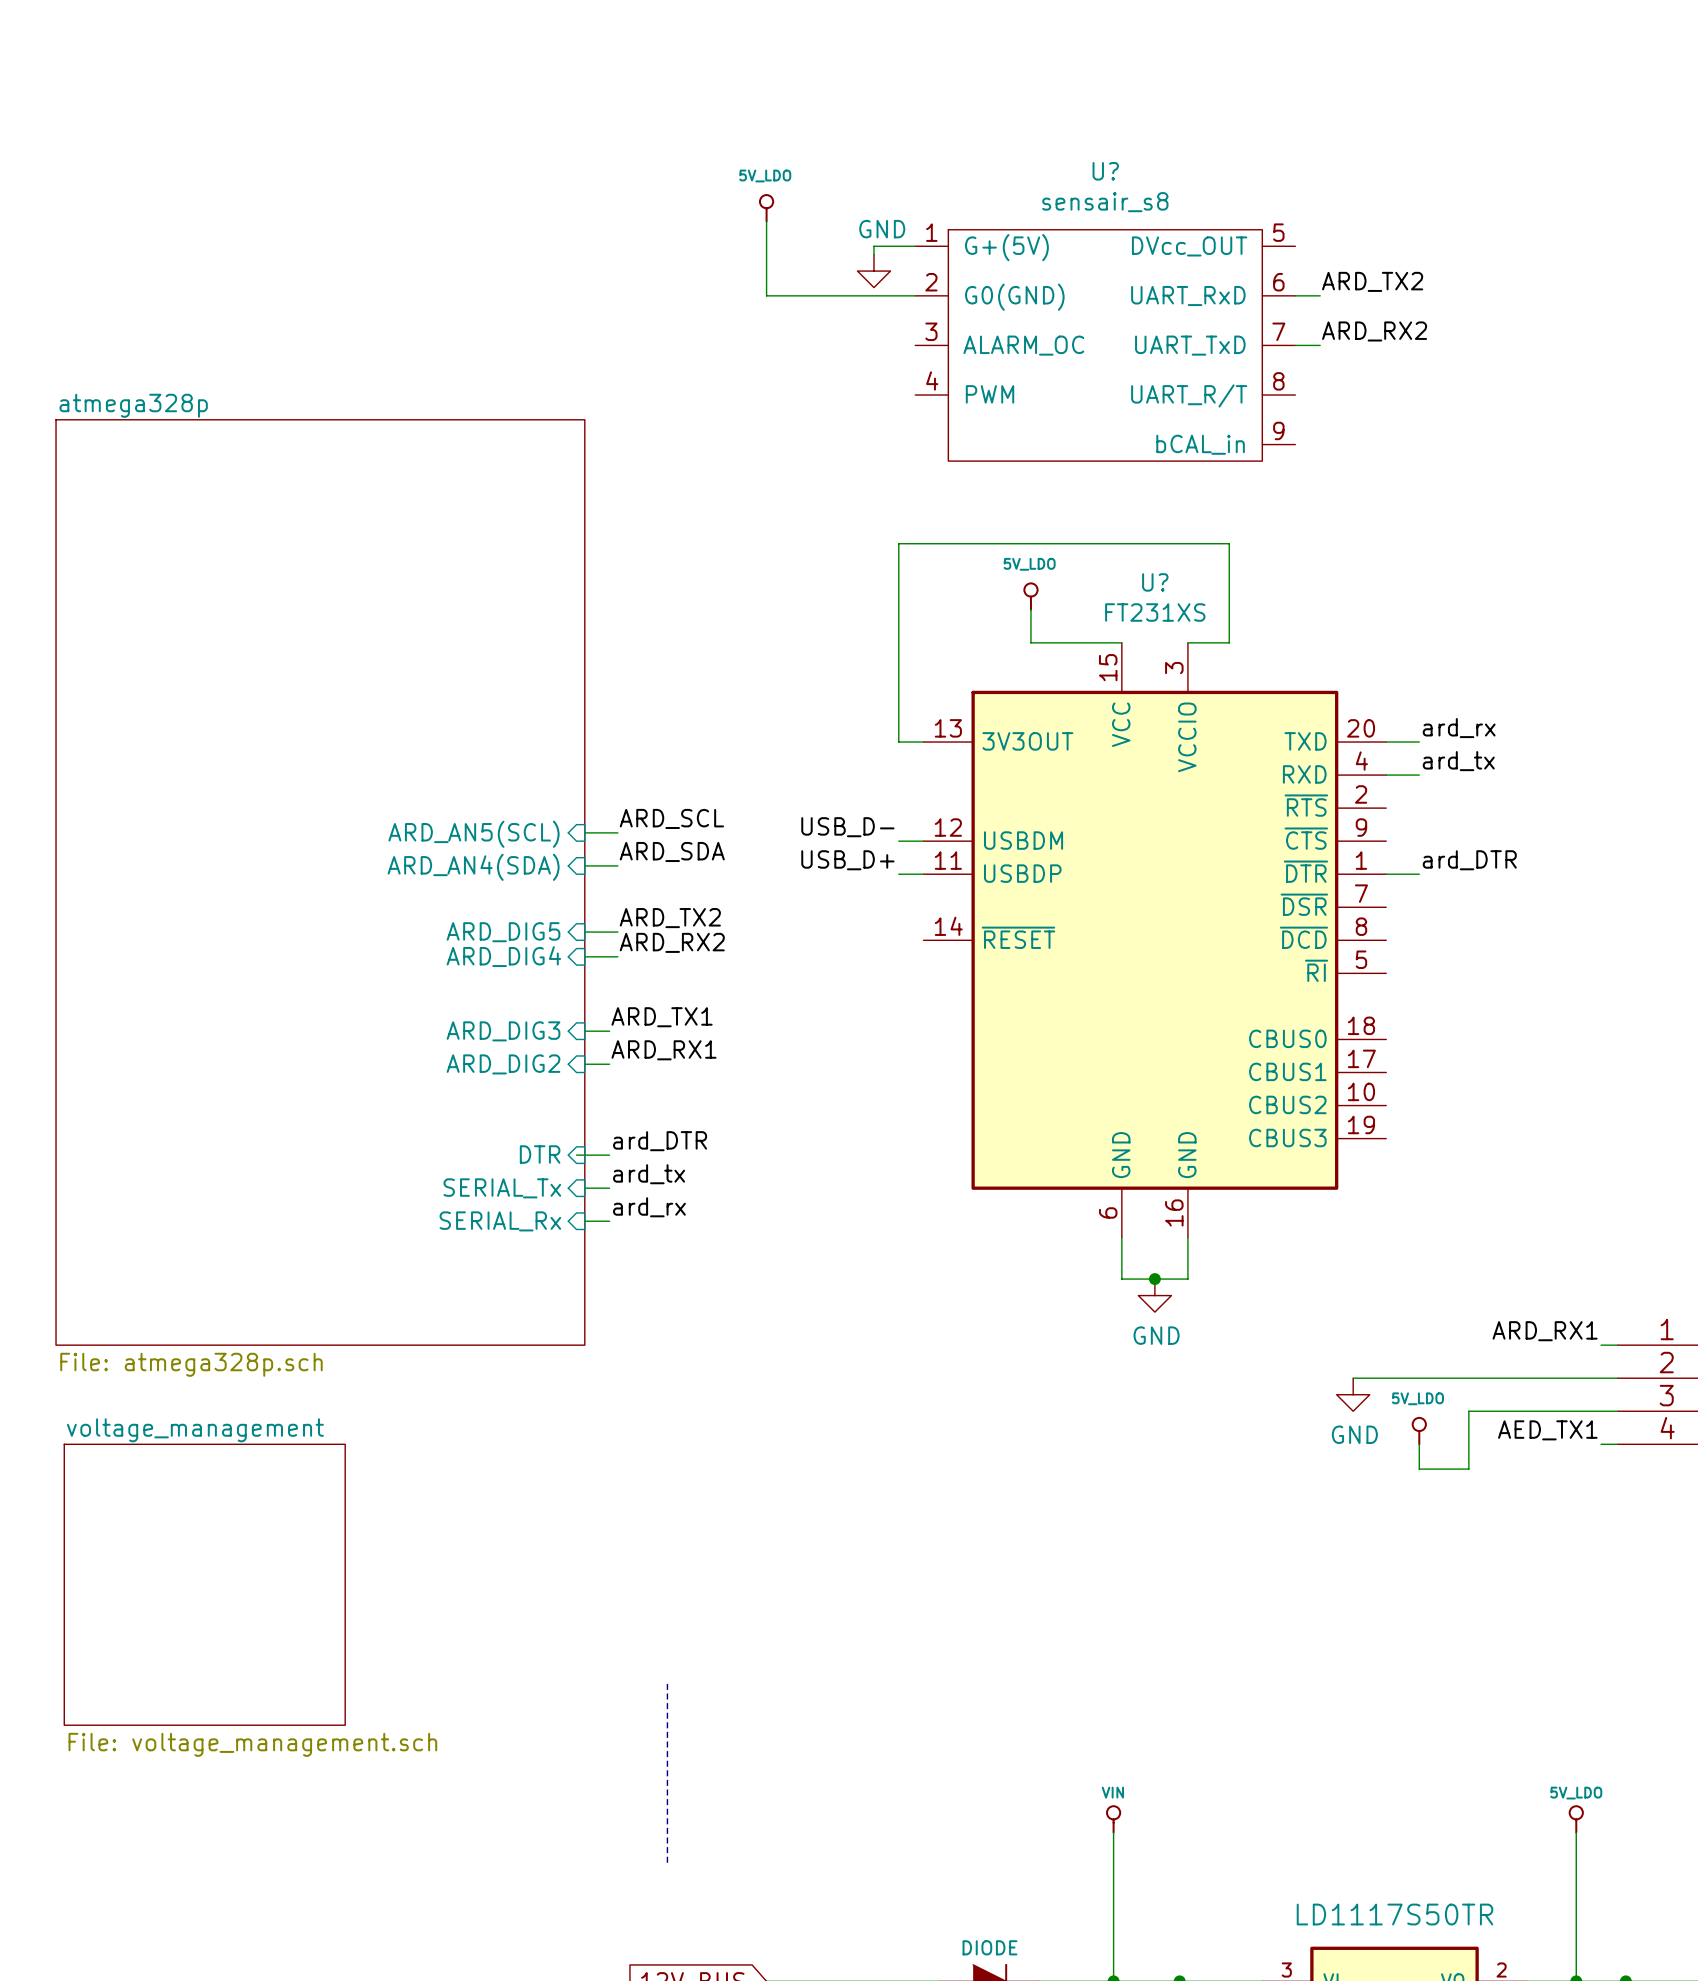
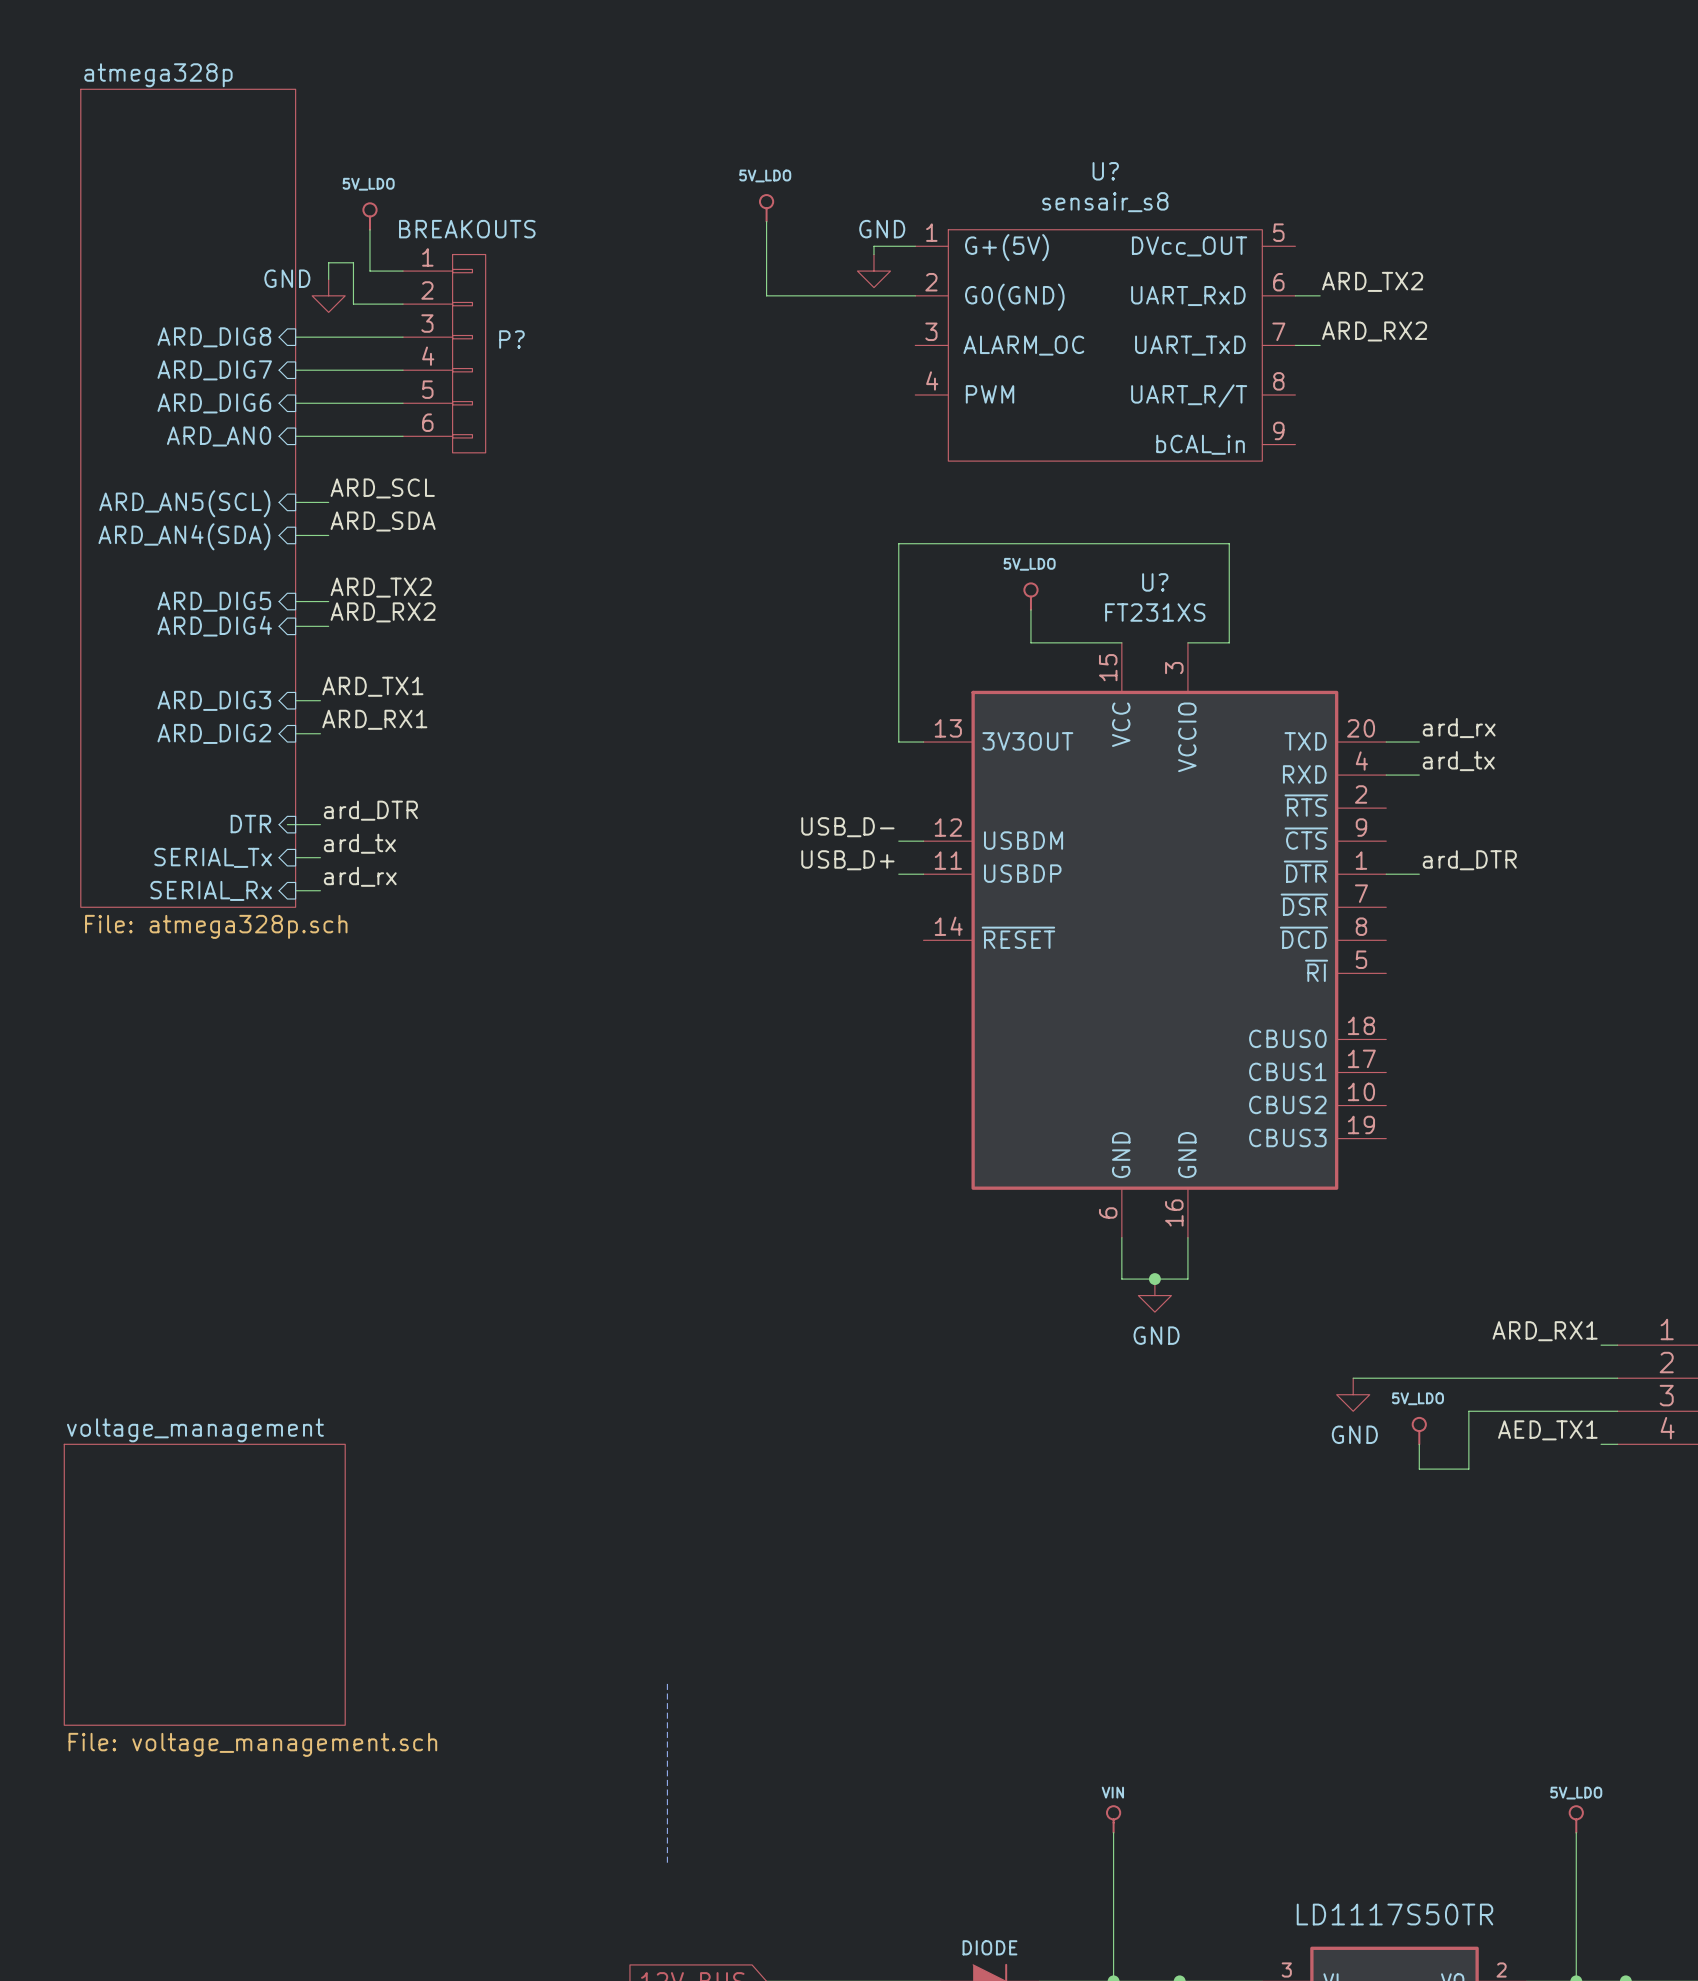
power symbol: none -> 5V_LDO (369, 216)
wire: none -> (369, 229) (369, 271) (403, 271)
wire: none -> (328, 279) (328, 262) (353, 262) (353, 304) (403, 304)
power symbol: none -> GND (328, 295)
sheet pin: none -> ARD_DIG8 (214, 337)
wire: none -> (295, 337) (403, 337)
P?: none -> BREAKOUTS (444, 353)
sheet pin: none -> ARD_DIG7 (214, 370)
wire: none -> (295, 370) (403, 370)
sheet pin: none -> ARD_DIG6 (214, 403)
wire: none -> (295, 403) (403, 403)
sheet atmega328p name position: atmega328p (133, 405) -> atmega328p (158, 75)
sheet atmega328p shape: [56, 419, 585, 1346] -> [80, 89, 296, 908]
sheet pin: none -> ARD_AN0 (219, 436)
wire: none -> (295, 436) (403, 436)
label: none -> ARD_SCL (382, 488)
wire: none -> (295, 502) (328, 502)
sheet pin: none -> ARD_AN5(SCL) (184, 503)
label: none -> ARD_SDA (383, 521)
wire: none -> (295, 535) (328, 535)
sheet pin: none -> ARD_AN4(SDA) (184, 536)
label: none -> ARD_TX2 (381, 587)
sheet pin: none -> ARD_DIG5 (214, 601)
wire: none -> (295, 601) (328, 601)
label: none -> ARD_RX2 (383, 612)
sheet pin: none -> ARD_DIG4 (214, 626)
wire: none -> (295, 626) (328, 626)
label: none -> ARD_TX1 (372, 686)
sheet pin: none -> ARD_DIG3 (214, 700)
wire: none -> (295, 700) (320, 700)
label: none -> ARD_RX1 (374, 719)
sheet pin: none -> ARD_DIG2 (214, 733)
wire: none -> (295, 733) (320, 733)
label: none -> ard_DTR (370, 810)
label: ARD_SCL (671, 818) -> none
sheet pin: none -> DTR (250, 824)
wire: (584, 832) (617, 832) -> (287, 824) (320, 824)
sheet pin: ARD_AN5(SCL) (473, 834) -> none
label: none -> ard_tx (359, 843)
label: ARD_SDA (672, 851) -> none
sheet pin: none -> SERIAL_Tx (213, 857)
wire: none -> (295, 857) (320, 857)
wire: (584, 865) (617, 865) -> none
sheet pin: ARD_AN4(SDA) (473, 867) -> none
label: none -> ard_rx (360, 876)
sheet pin: none -> SERIAL_Rx (211, 890)
label: ARD_TX2 (670, 918) -> none
sheet pin: ARD_DIG5 (503, 932) -> none
wire: (584, 932) (617, 932) -> none
label: ARD_RX2 (672, 942) -> none
sheet pin: ARD_DIG4 (503, 956) -> none
wire: (584, 956) (617, 956) -> none
label: ARD_TX1 (662, 1017) -> none
sheet pin: ARD_DIG3 (503, 1031) -> none
wire: (584, 1031) (609, 1031) -> (295, 890) (320, 890)
label: ARD_RX1 (664, 1050) -> none
sheet pin: ARD_DIG2 (503, 1064) -> none
wire: (584, 1064) (609, 1064) -> none
label: ard_DTR (660, 1141) -> none
sheet pin: DTR (540, 1154) -> none
wire: (576, 1155) (609, 1155) -> none
label: ard_tx (649, 1174) -> none
sheet pin: SERIAL_Tx (502, 1188) -> none
wire: (584, 1188) (609, 1188) -> none
label: ard_rx (649, 1207) -> none
sheet pin: SERIAL_Rx (500, 1221) -> none
wire: (584, 1221) (609, 1221) -> none
sheet atmega328p value position: File: atmega328p.sch (191, 1364) -> File: atmega328p.sch (216, 926)

